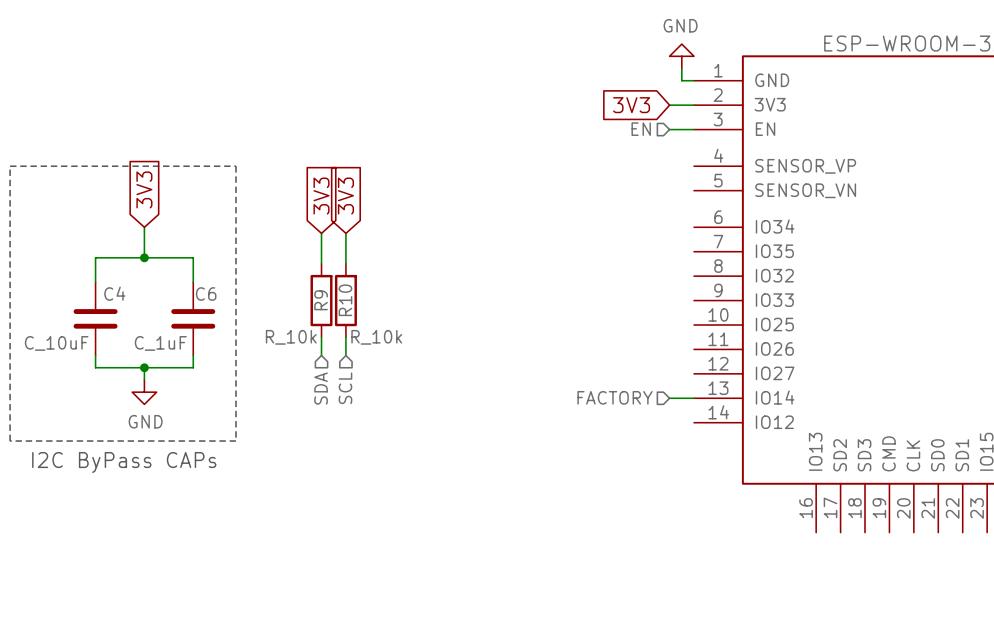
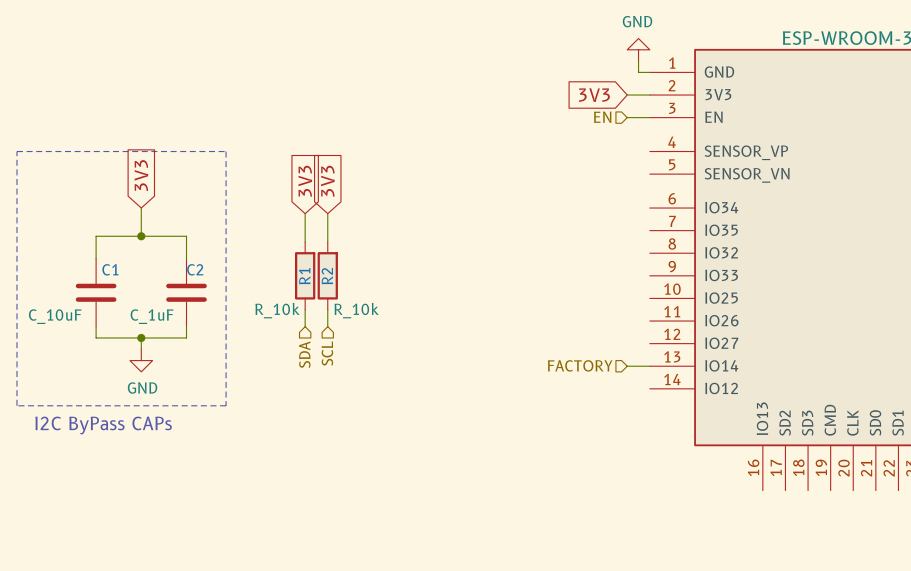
C4 name: C4 (114, 293) -> C1 (110, 269)
C6 name: C6 (206, 294) -> C2 (195, 269)
R9 name: R9 (321, 300) -> R1 (304, 276)
R10 name: R10 (345, 300) -> R2 (327, 276)

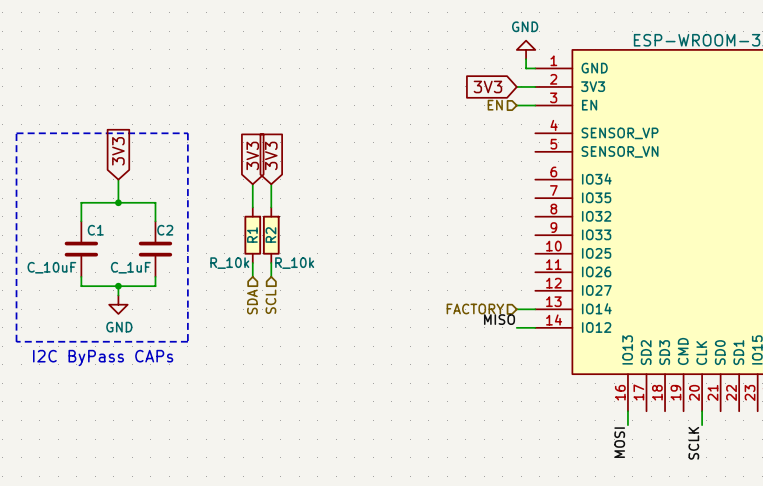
label: none -> MISO (499, 319)
wire: none -> (516, 327) (535, 327)
wire: none -> (627, 411) (627, 425)
wire: none -> (702, 411) (702, 425)
label: none -> SCLK (693, 443)
label: none -> MOSI (619, 442)

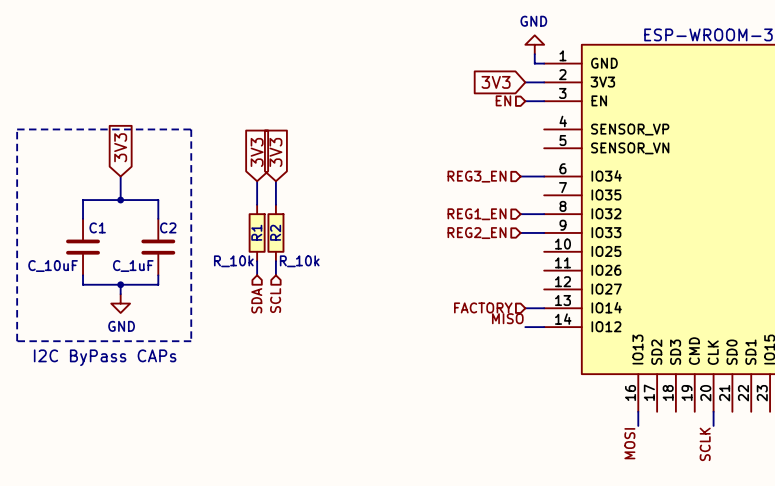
hierarchical label: none -> REG3_EN (477, 176)
wire: none -> (520, 176) (544, 176)
hierarchical label: none -> REG1_EN (477, 214)
wire: none -> (520, 214) (544, 214)
hierarchical label: none -> REG2_EN (477, 233)
wire: none -> (520, 232) (544, 232)

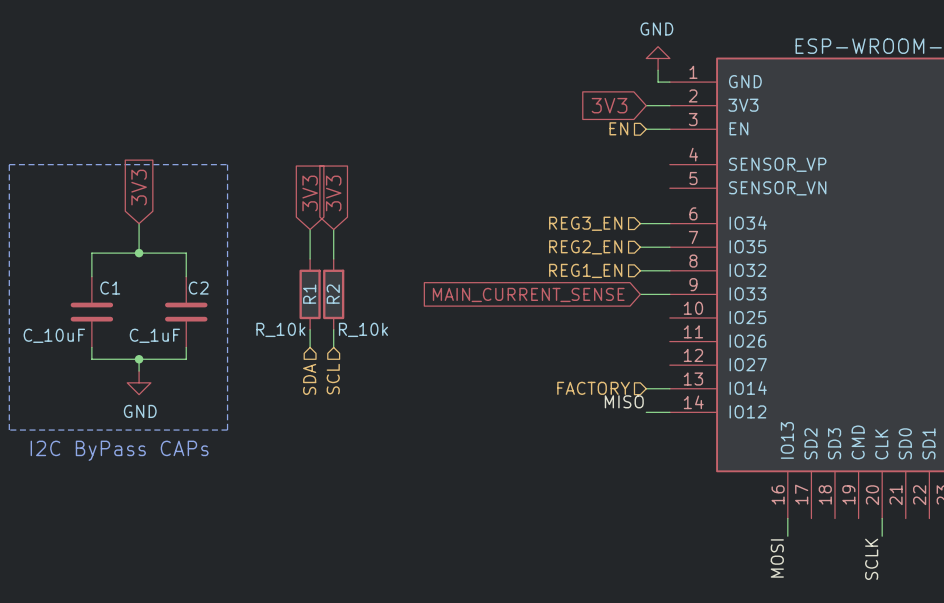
wire: none -> (640, 247) (669, 247)
global label: none -> MAIN_CURRENT_SENSE (528, 294)
hierarchical label position: REG2_EN (477, 233) -> REG2_EN (585, 247)

